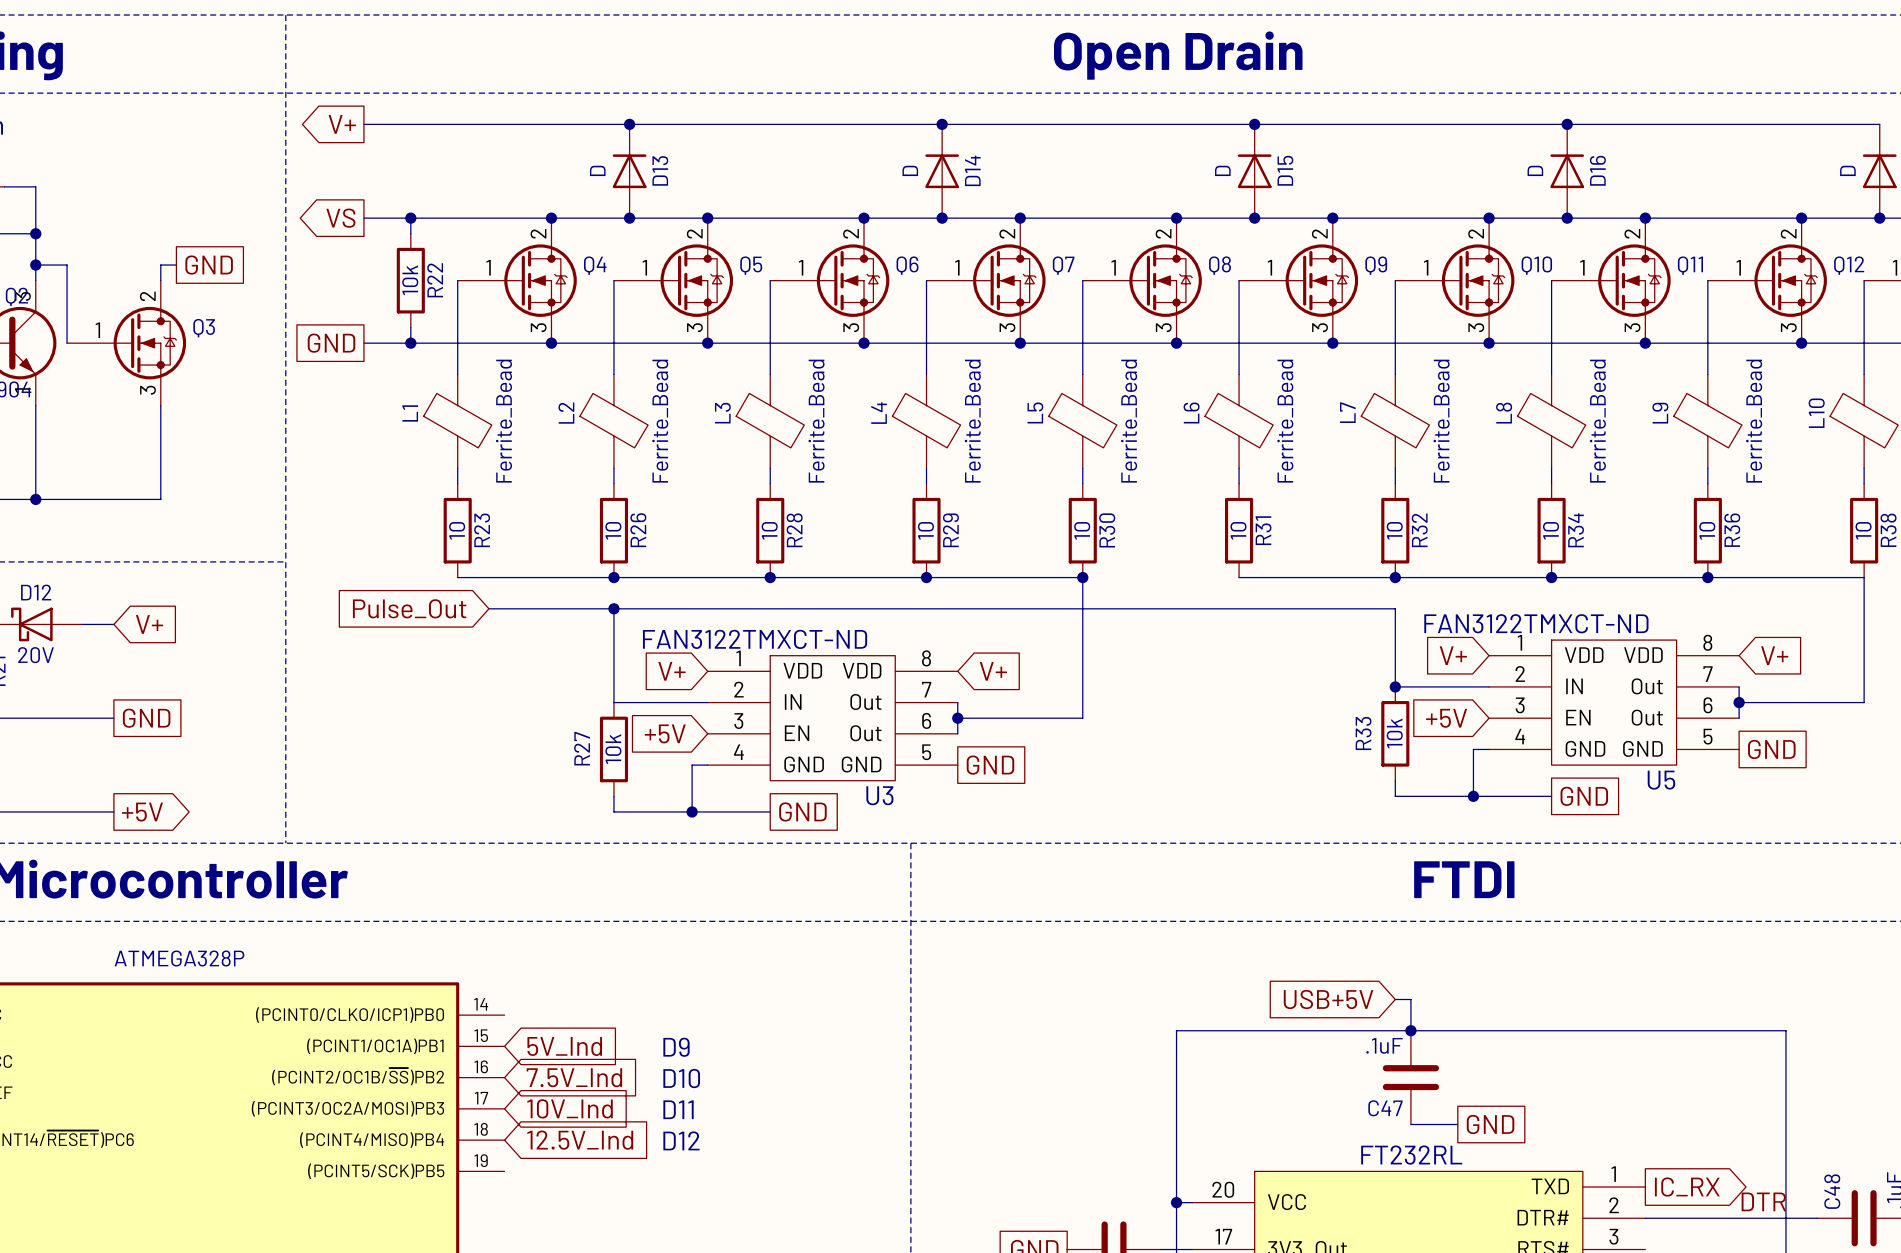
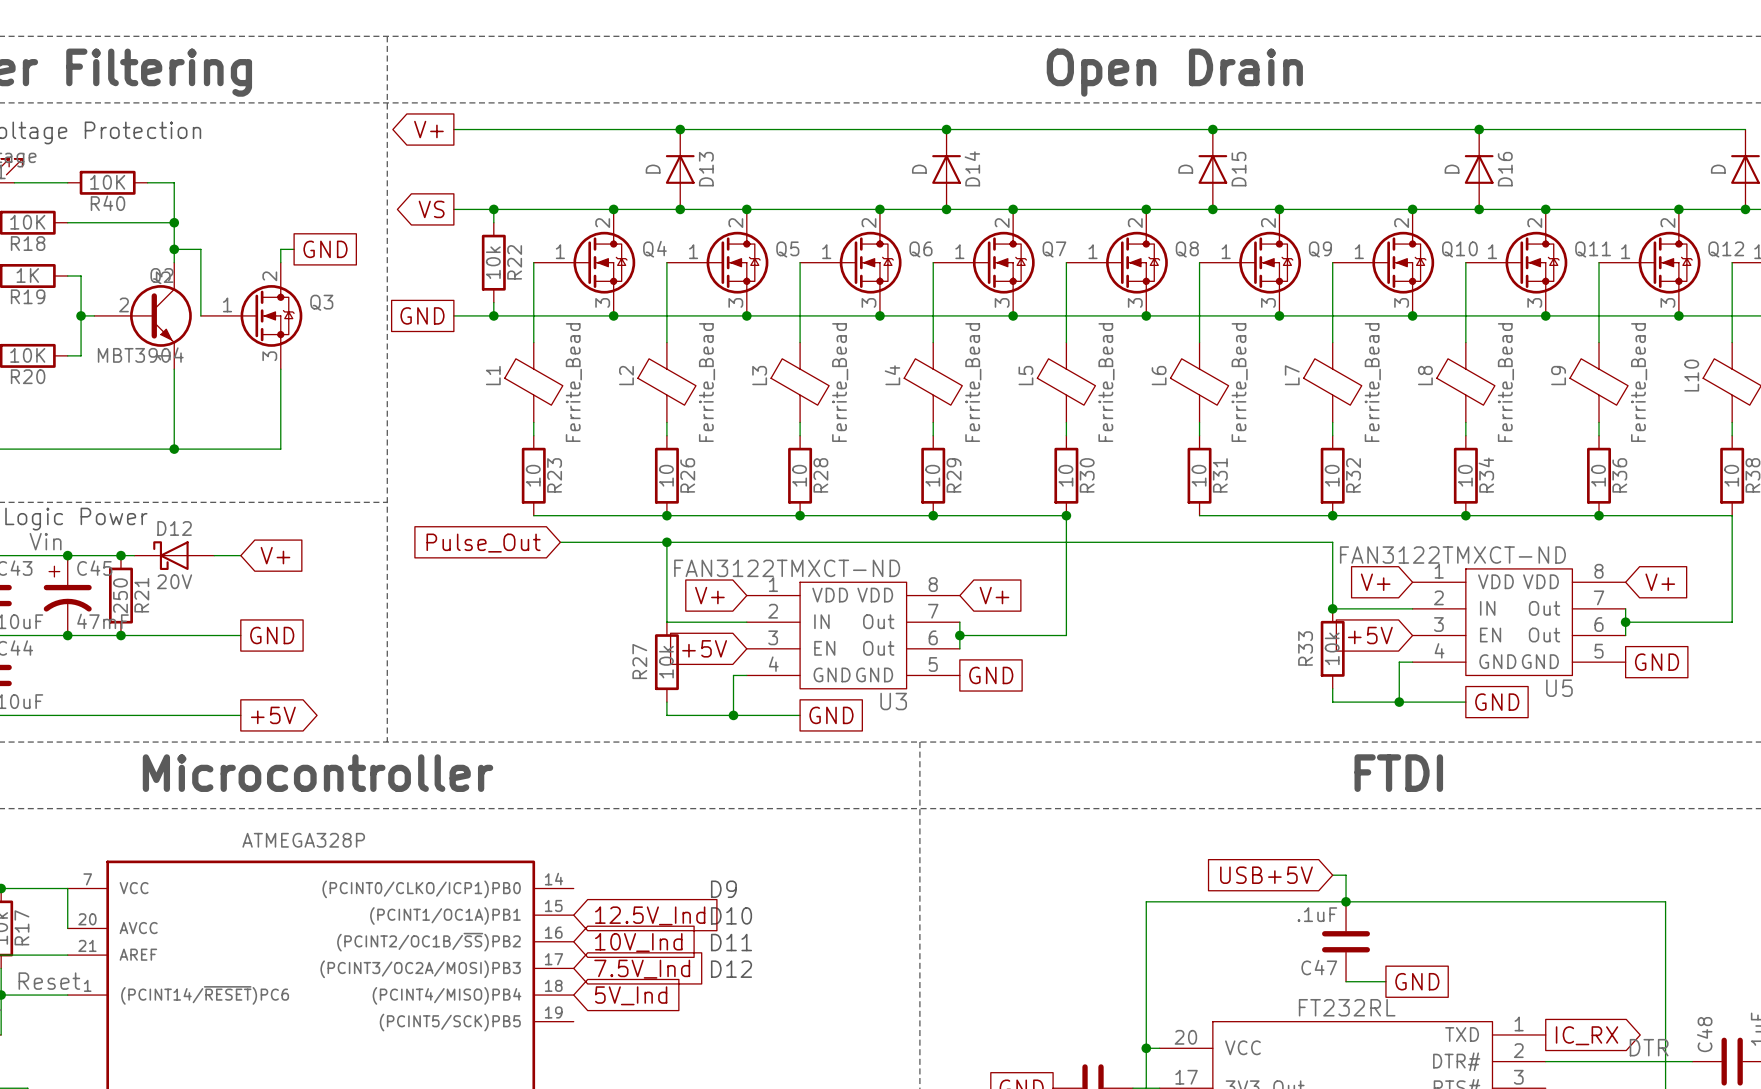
text: none -> D9 (723, 889)
global label: 5V_Ind (564, 1046) -> 12.5V_Ind (650, 915)
text: D9 (676, 1047) -> D10 (731, 915)
global label: 7.5V_Ind (574, 1077) -> 10V_Ind (638, 942)
text: D10 (681, 1078) -> D11 (731, 942)
global label: 10V_Ind (570, 1108) -> 7.5V_Ind (642, 969)
text: D11 (678, 1109) -> D12 (731, 969)
global label: 12.5V_Ind (580, 1140) -> 5V_Ind (631, 995)
text: D12 (681, 1140) -> none

